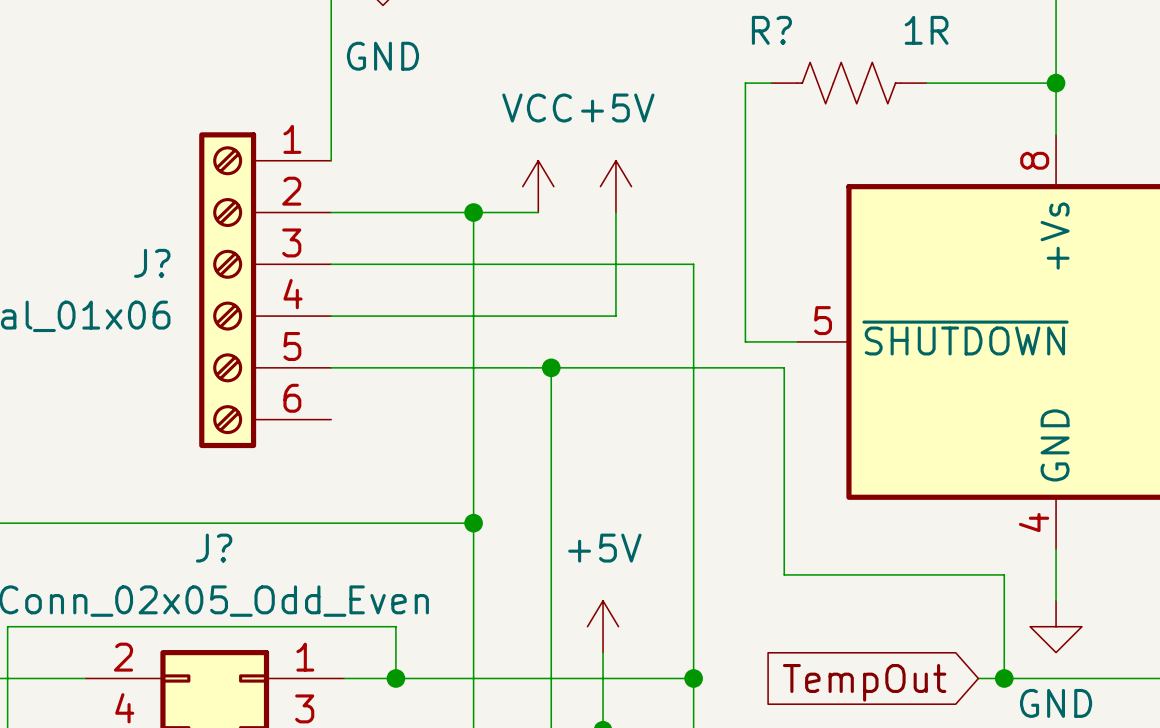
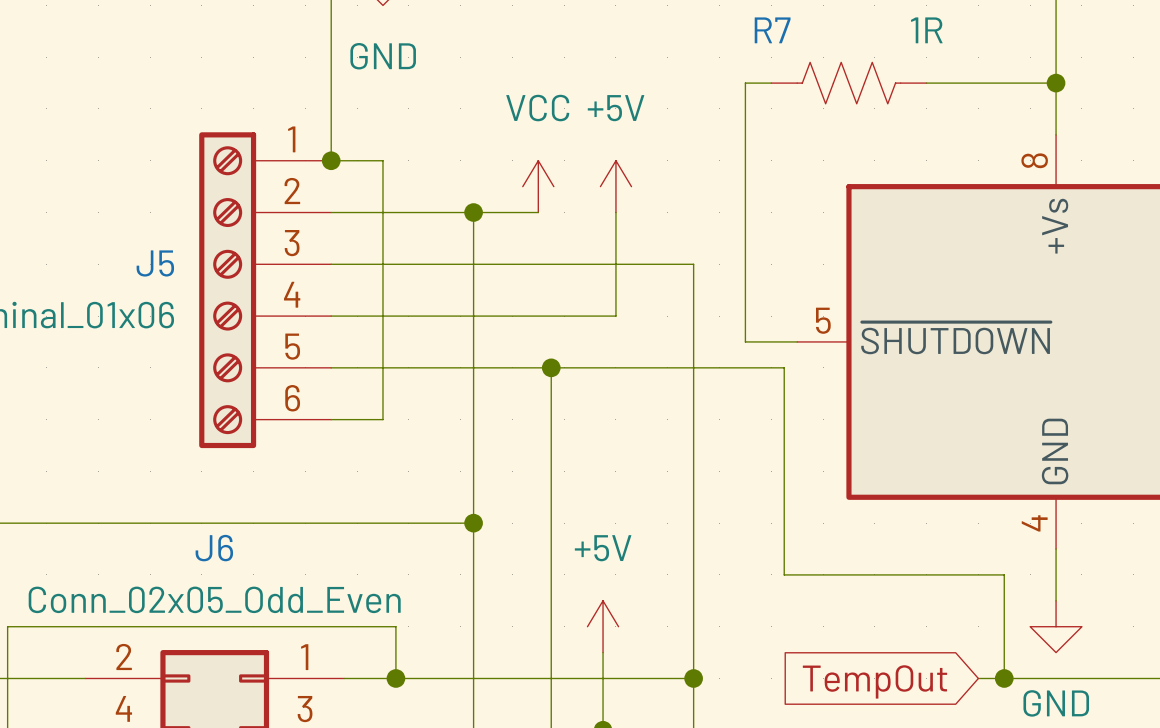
R? name: R? (771, 30) -> R7 (772, 30)
wire: none -> (331, 160) (382, 160) (382, 419) (331, 419)
junction: none -> (331, 160)
J? name: J? (152, 263) -> J5 (155, 263)
J? name: J? (214, 548) -> J6 (214, 548)

